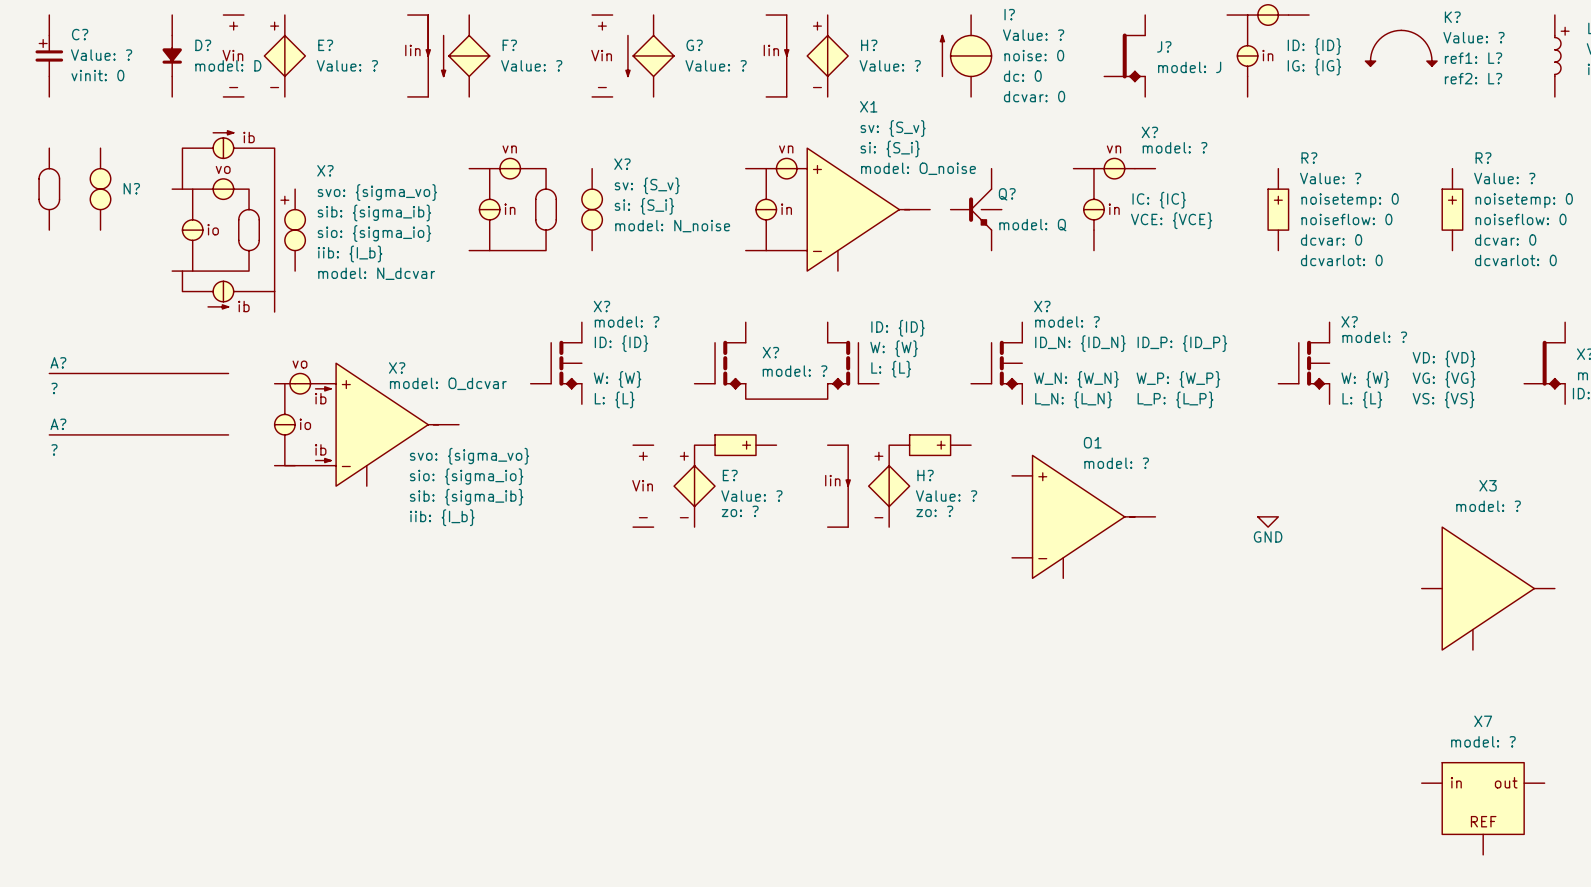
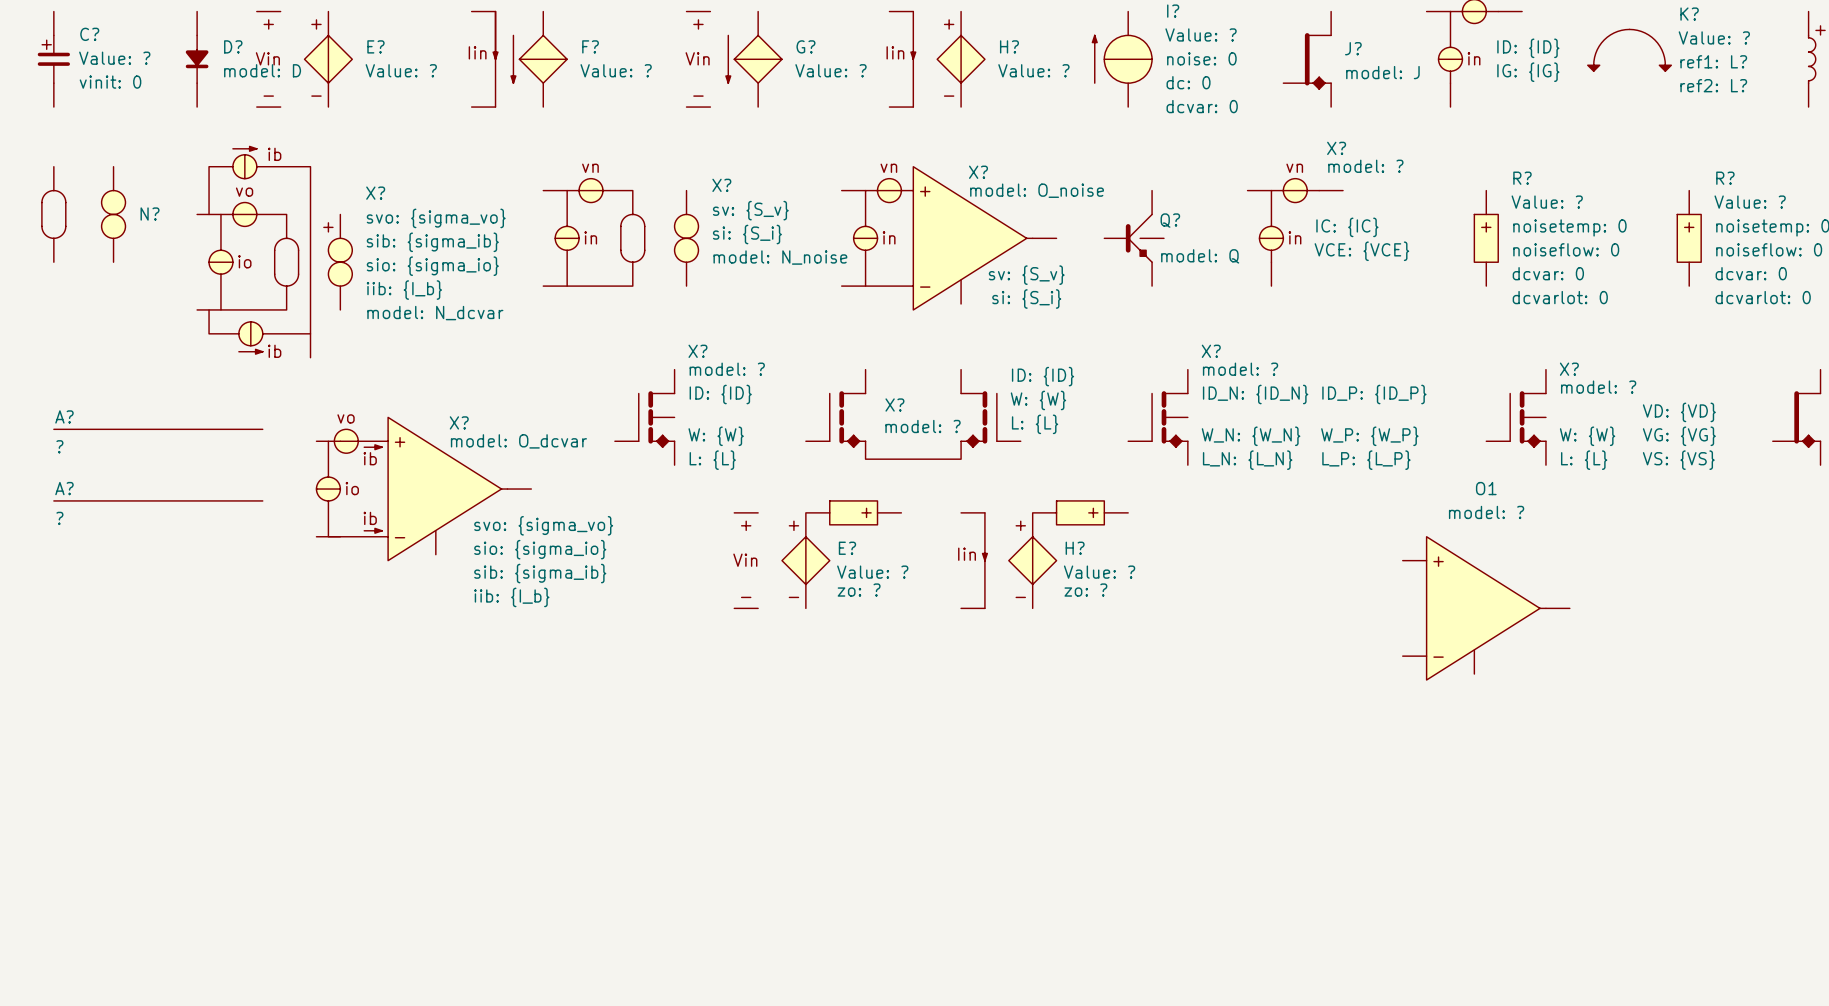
X? symbol: [172, 130, 306, 313] -> [197, 146, 353, 358]
X?: none -> (949, 238)
X1: (837, 209) -> none
X? symbol: [274, 363, 459, 487] -> [316, 417, 532, 561]
O1 name position: O1 (1092, 442) -> O1 (1486, 488)
O1 symbol: [1012, 455, 1156, 579] -> [1402, 536, 1570, 681]
O1 text position: model: ? (1116, 463) -> model: ? (1486, 512)
power symbol: GND (1268, 521) -> none
X3: (1488, 588) -> none
X7: (1483, 808) -> none

